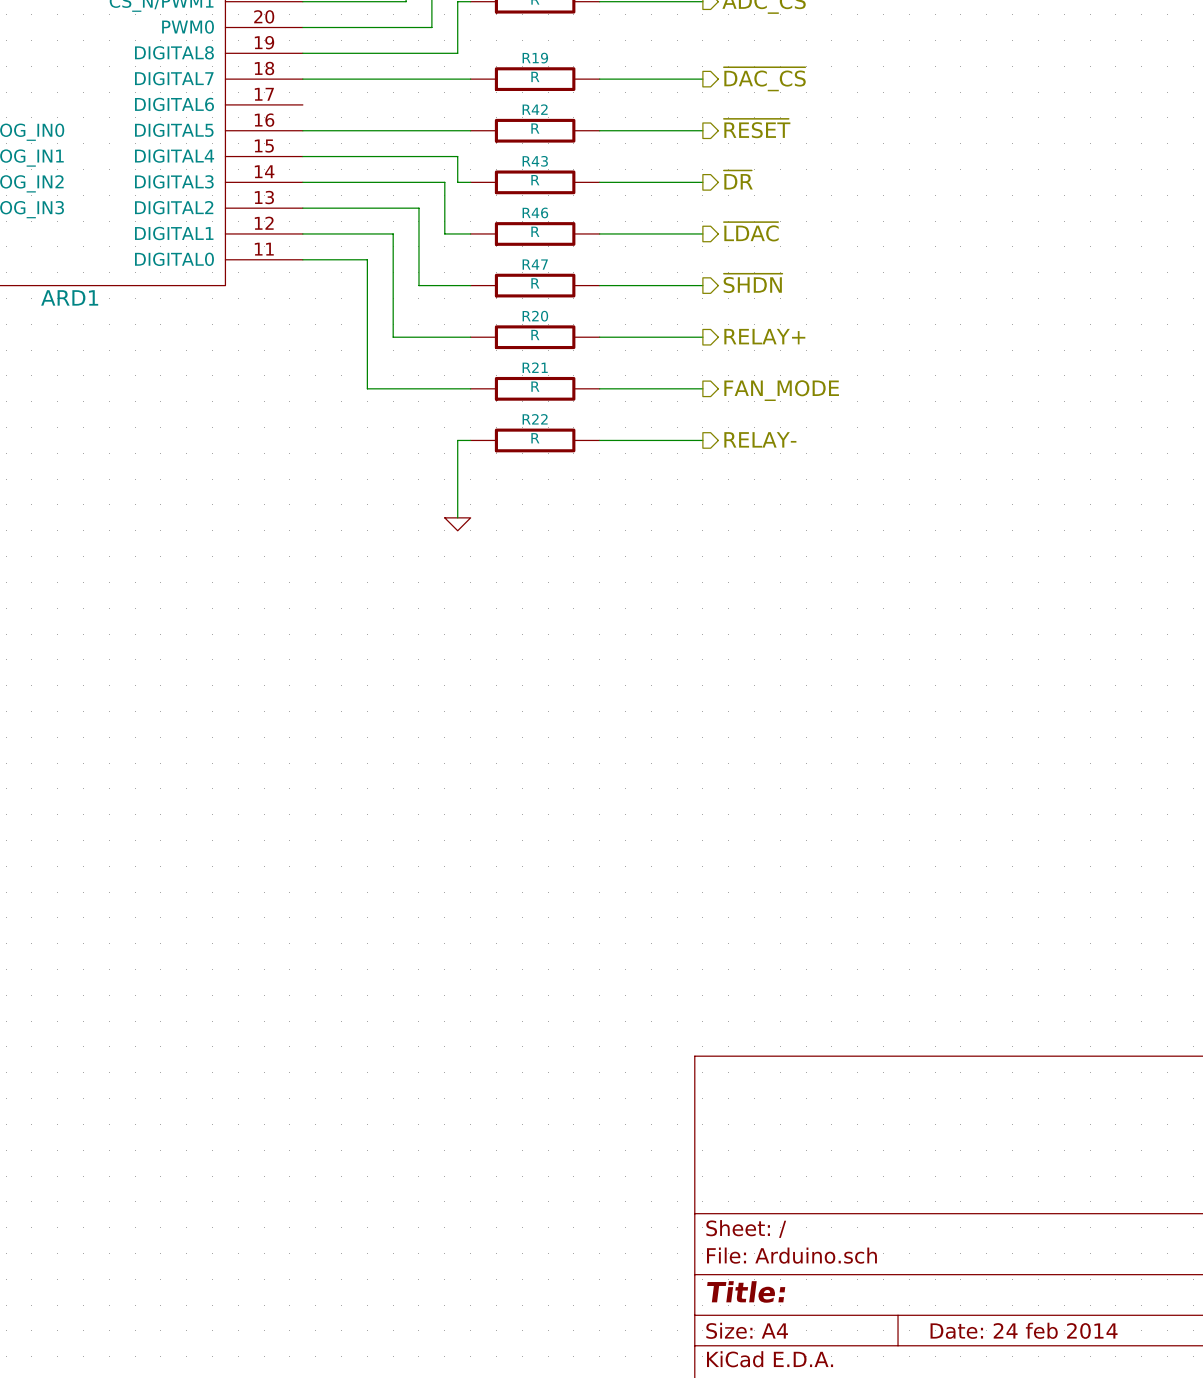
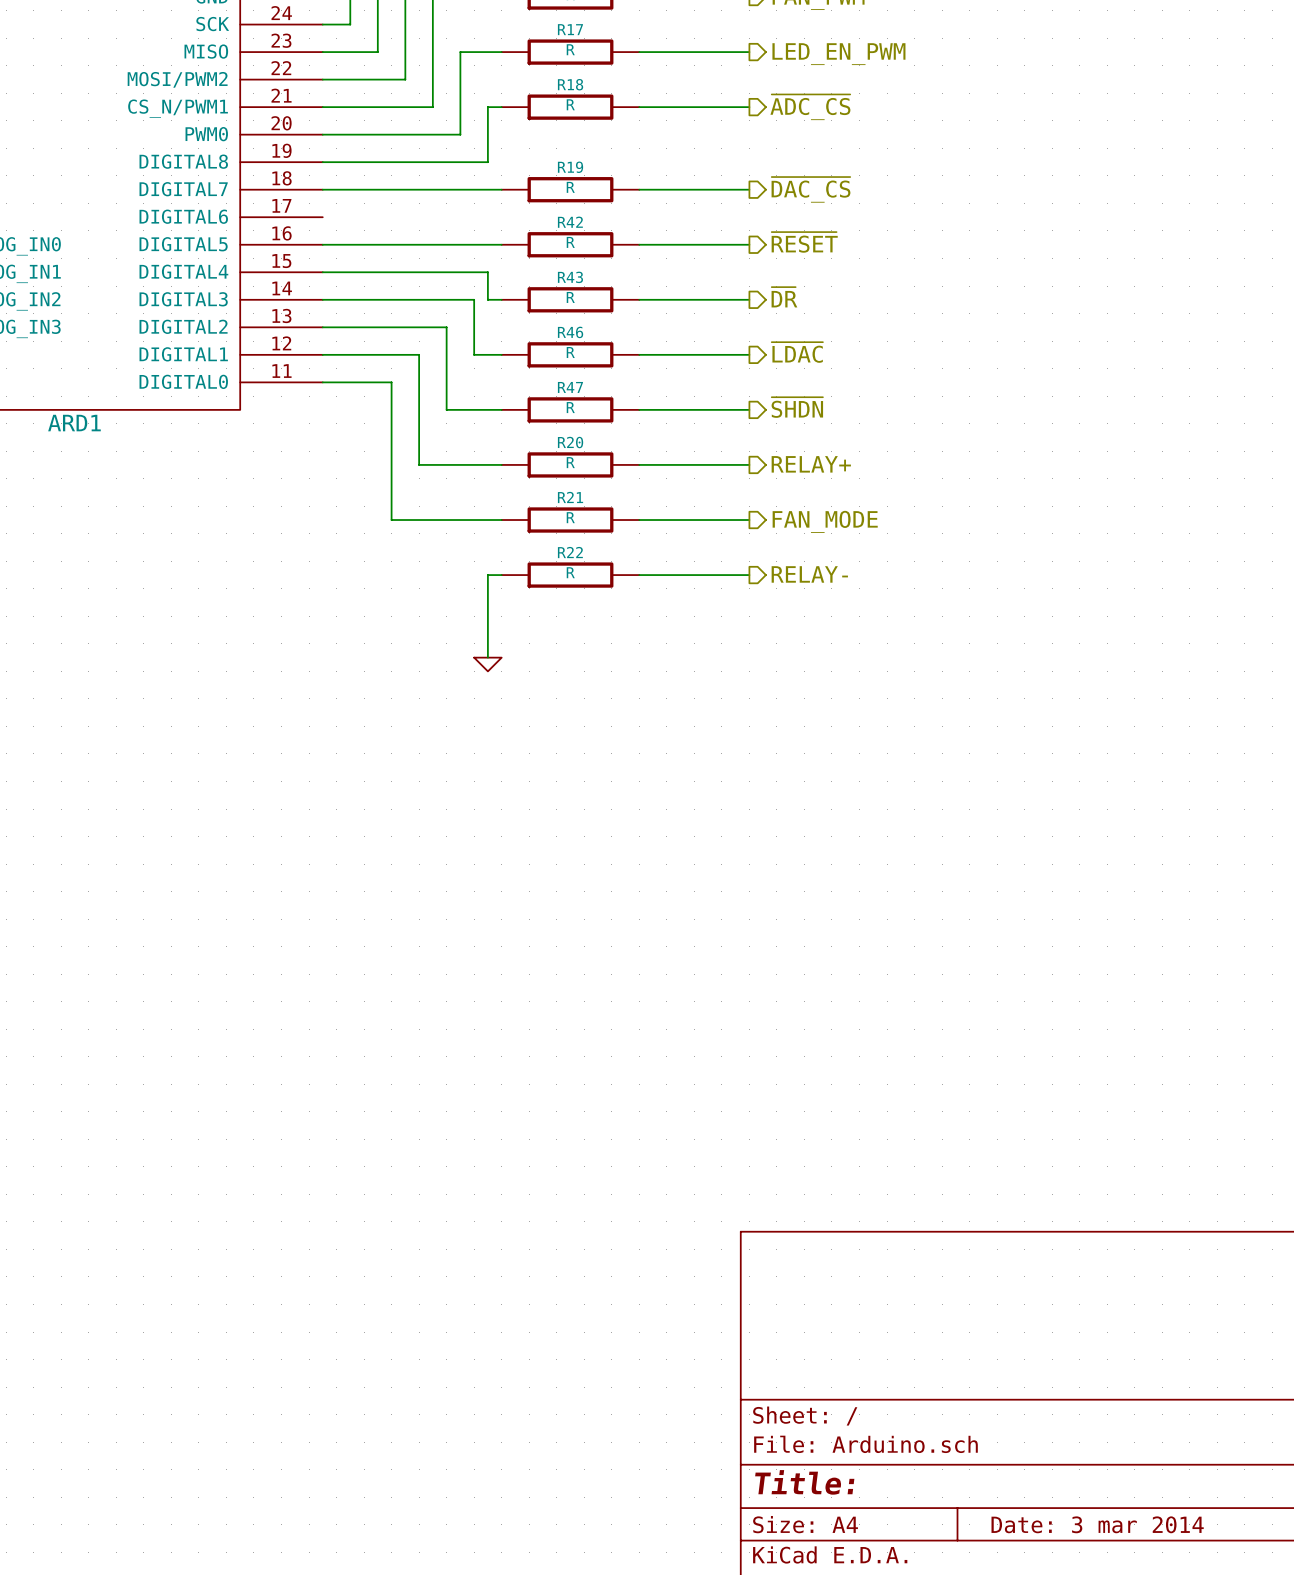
title block: Date: 24 feb 2014 (1024, 1330) -> Date: 3 mar 2014 (1097, 1524)

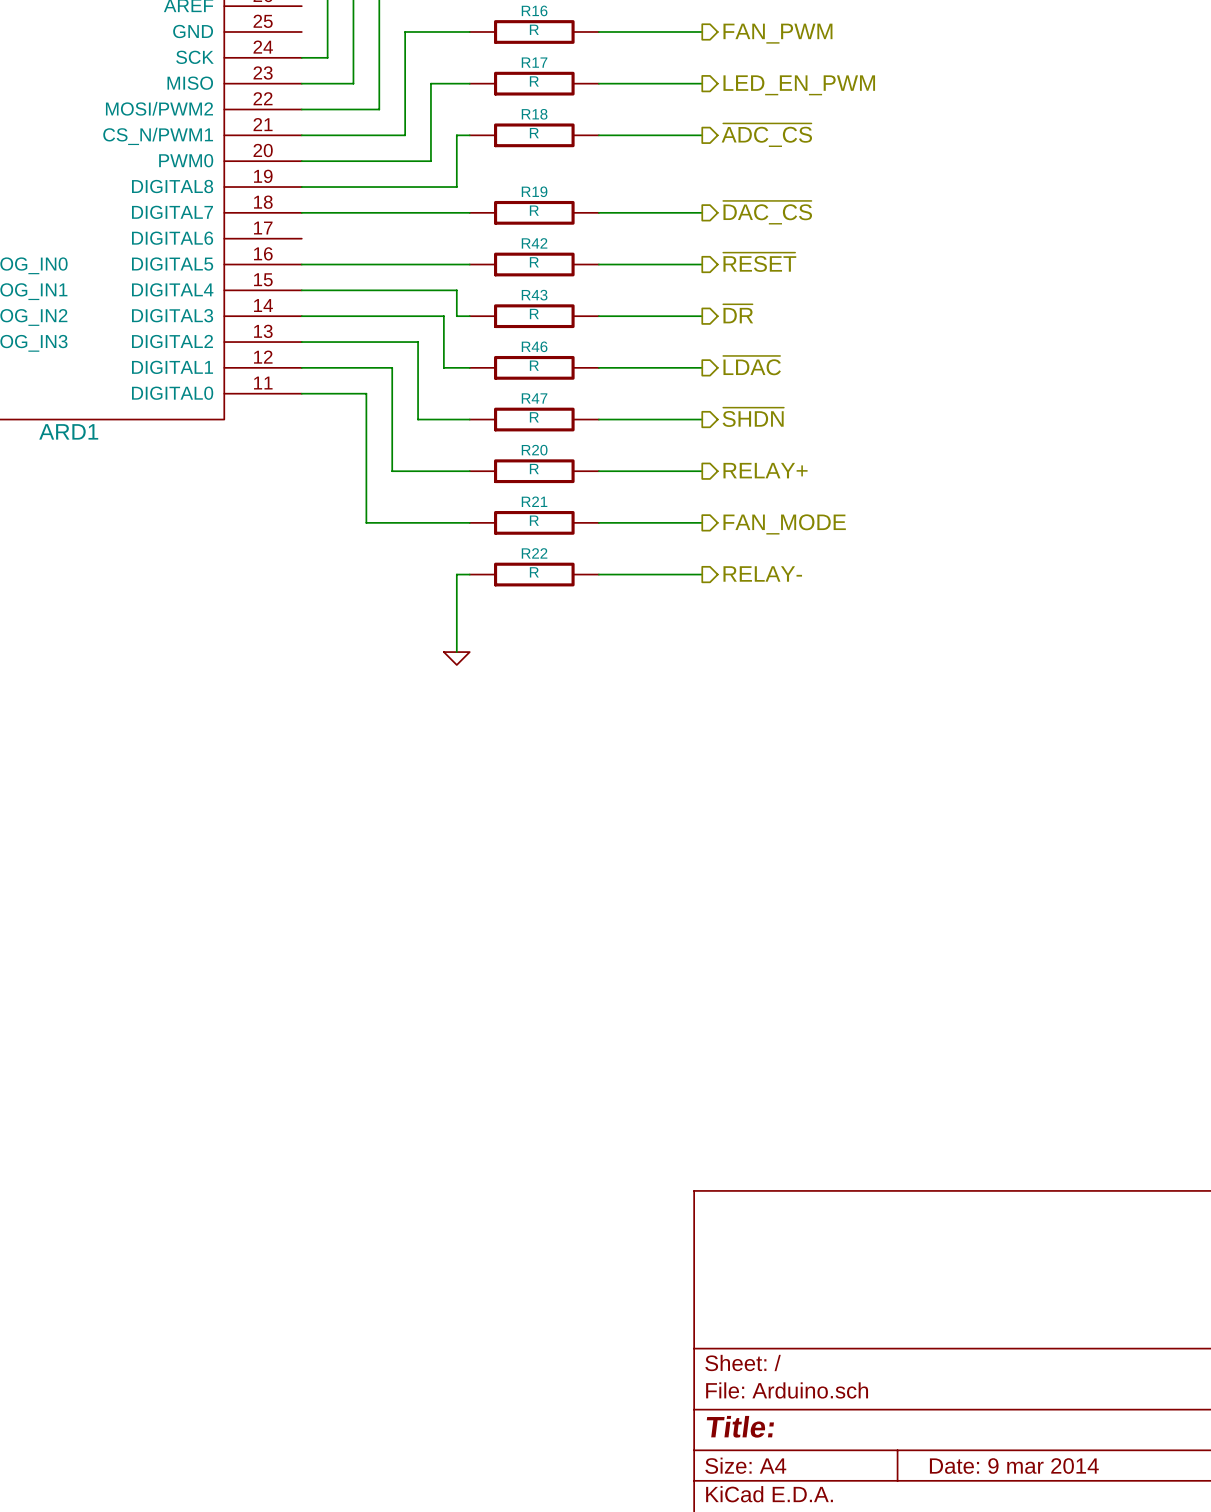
title block: Date: 3 mar 2014 (1097, 1524) -> Date: 9 mar 2014 (1014, 1466)

